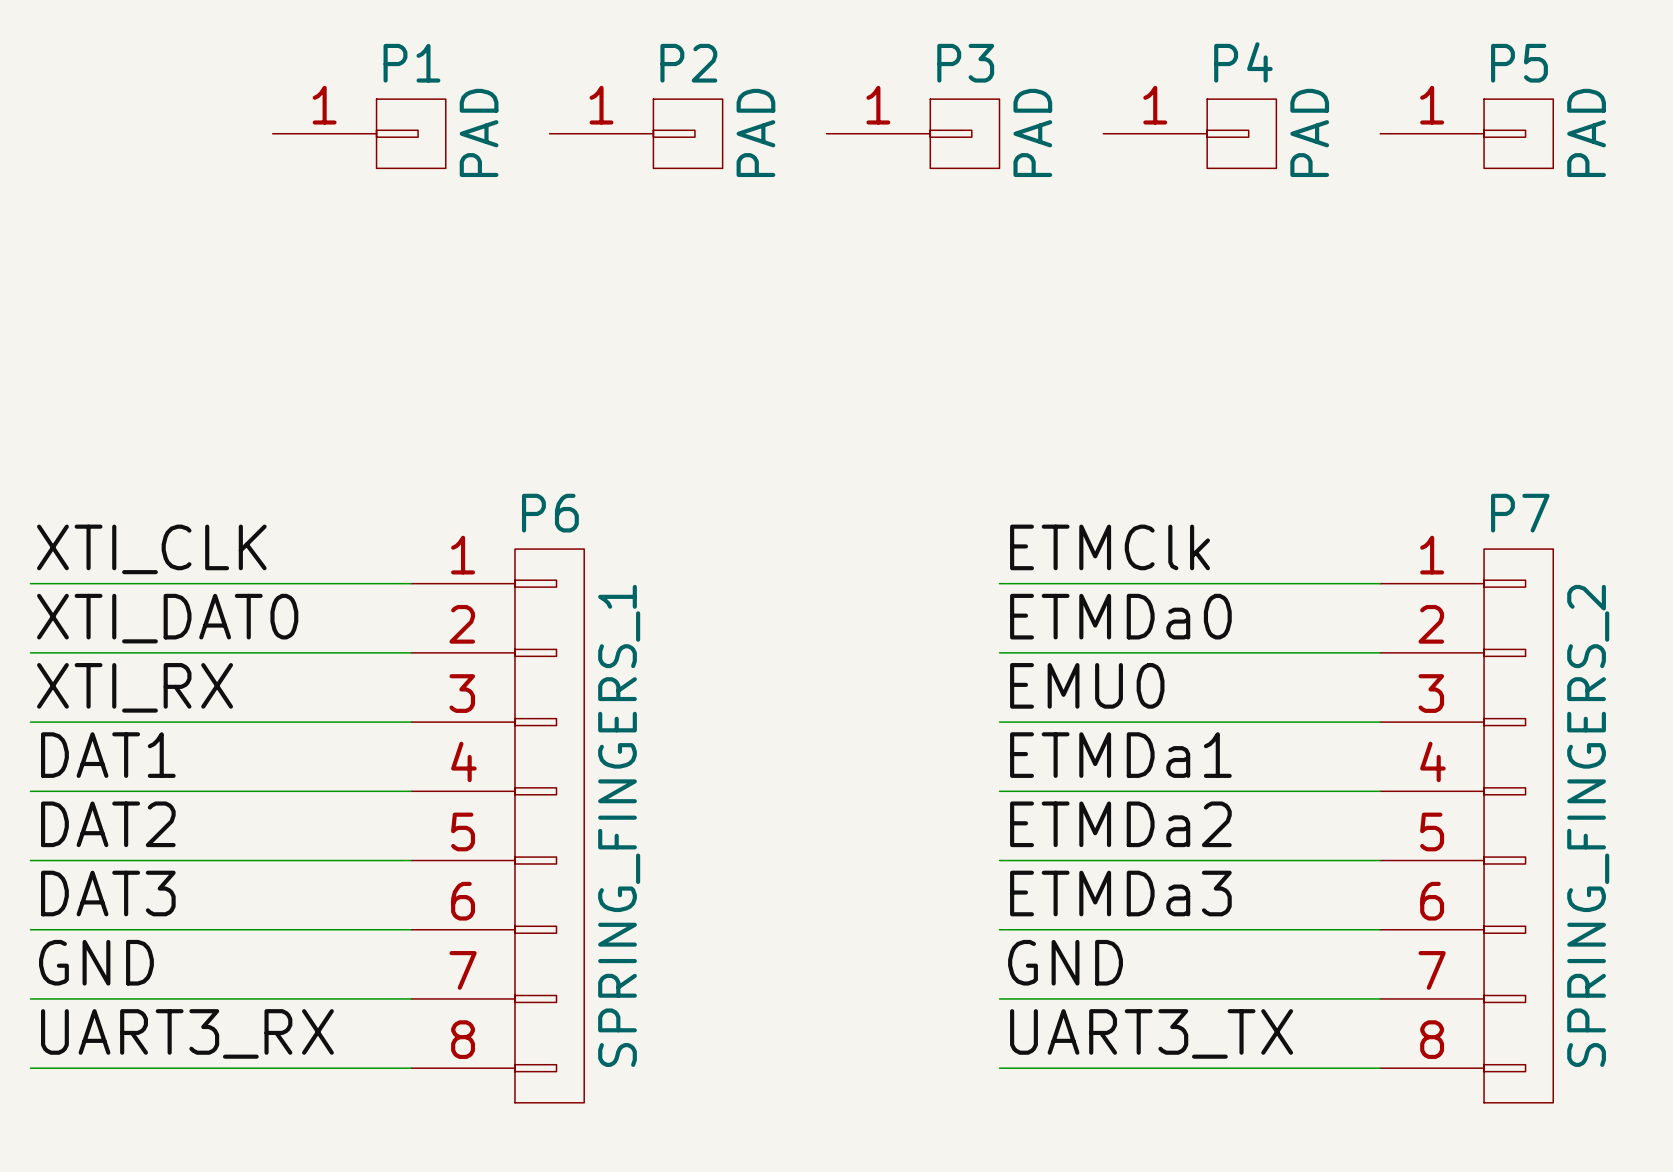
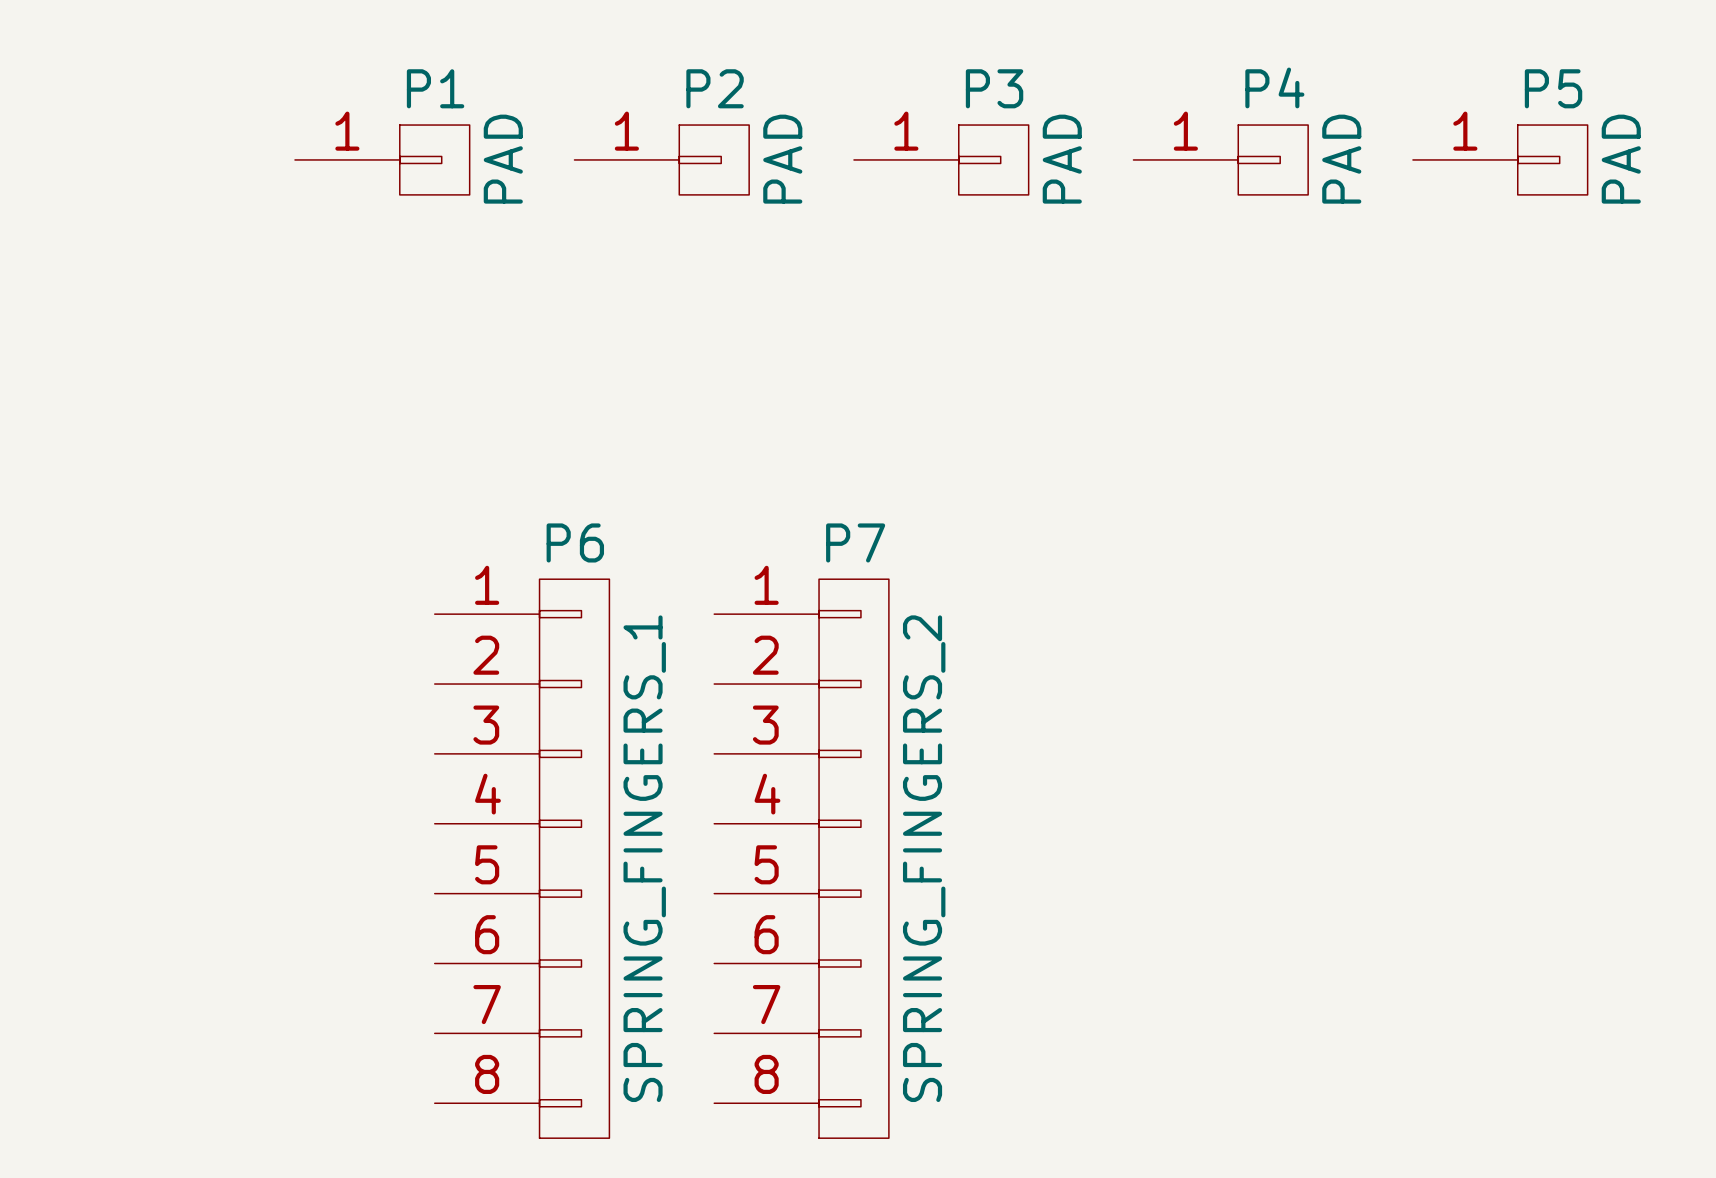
label: ETMClk (1110, 547) -> none
label: XTI_CLK (151, 549) -> none
wire: (30, 583) (411, 583) -> none
wire: (999, 583) (1380, 583) -> none
label: ETMDa0 (1120, 616) -> none
label: XTI_DAT0 (167, 618) -> none
wire: (30, 652) (411, 652) -> none
wire: (999, 652) (1380, 652) -> none
label: EMU0 (1087, 685) -> none
label: XTI_RX (135, 687) -> none
wire: (30, 722) (411, 722) -> none
wire: (999, 722) (1380, 722) -> none
label: DAT1 (108, 755) -> none
label: ETMDa1 (1120, 755) -> none
wire: (30, 791) (411, 791) -> none
wire: (999, 791) (1380, 791) -> none
label: DAT2 (108, 824) -> none
label: ETMDa2 (1120, 824) -> none
P7 position: (1466, 825) -> (801, 858)
wire: (30, 860) (411, 860) -> none
wire: (999, 860) (1380, 860) -> none
label: DAT3 (108, 893) -> none
label: ETMDa3 (1120, 893) -> none
wire: (30, 929) (411, 929) -> none
wire: (999, 929) (1380, 929) -> none
label: GND (96, 962) -> none
label: GND (1065, 962) -> none
wire: (30, 998) (411, 998) -> none
wire: (999, 998) (1380, 998) -> none
label: UART3_RX (187, 1033) -> none
label: UART3_TX (1151, 1033) -> none
wire: (30, 1068) (411, 1068) -> none
wire: (999, 1068) (1380, 1068) -> none

